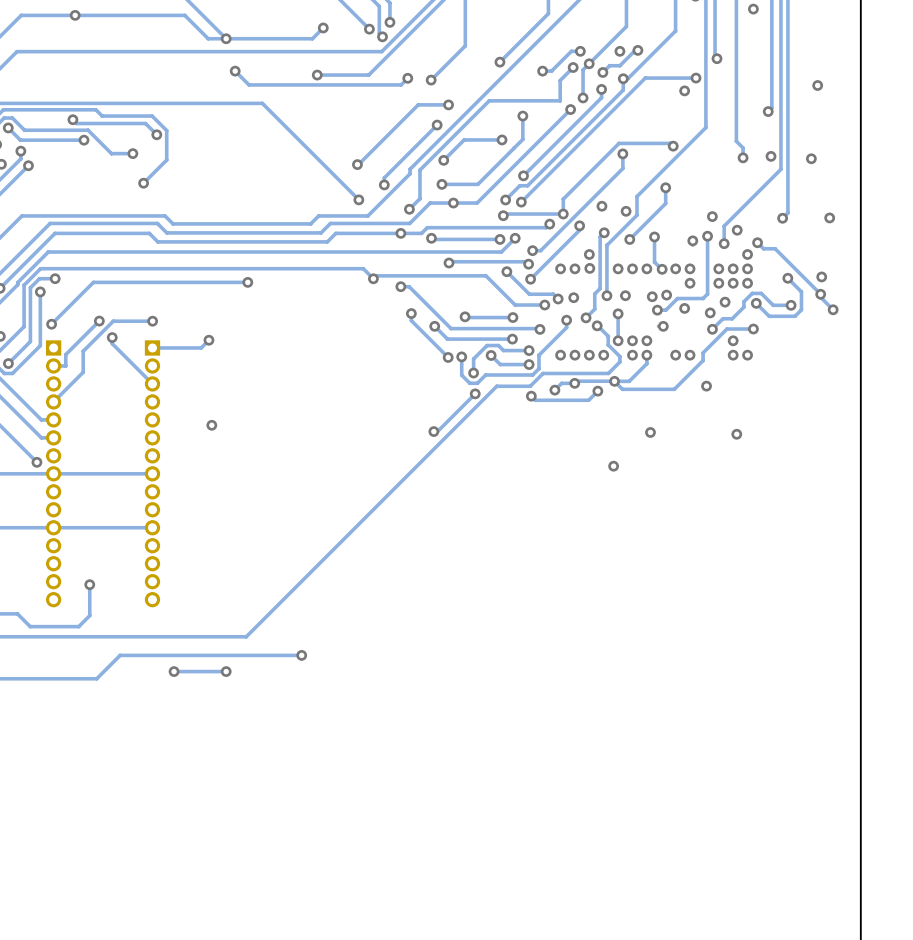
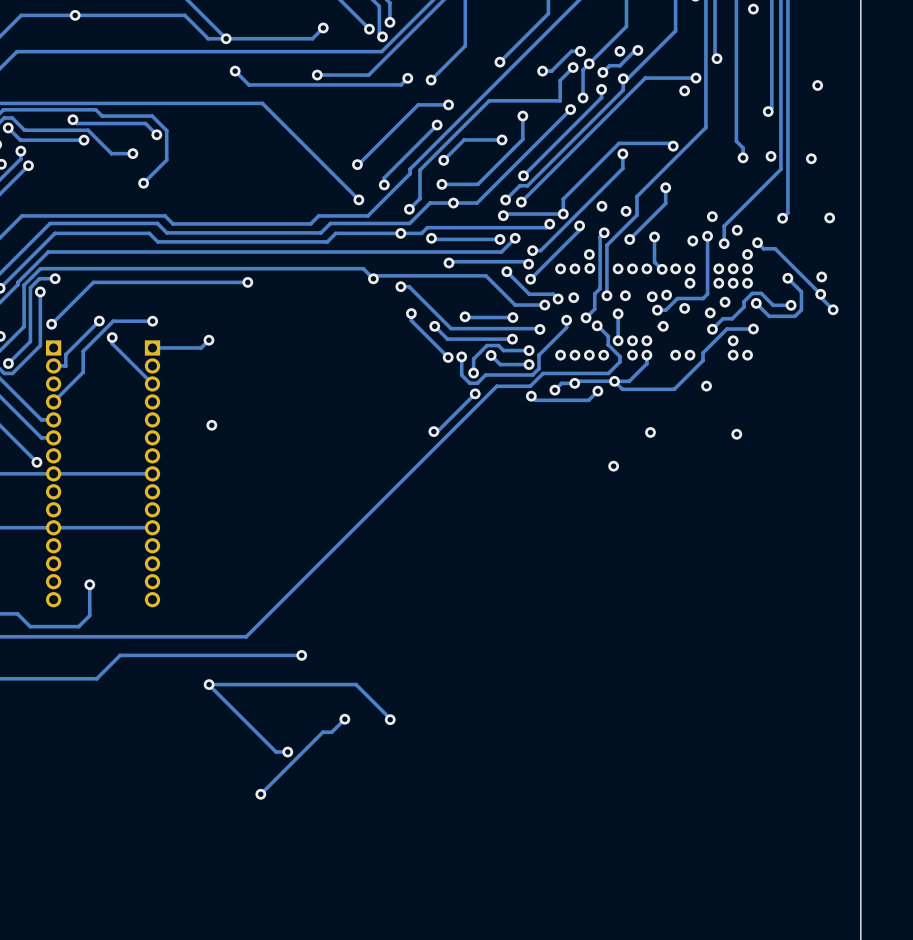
via: (174, 671) -> none
track: (226, 671) (174, 671) -> none
via: (226, 671) -> none
via: none -> (209, 684)
track: none -> (344, 719) (331, 732) (322, 732) (260, 794)
via: none -> (344, 719)
track: none -> (390, 719) (356, 684) (209, 684) (276, 752) (287, 752)
via: none -> (390, 719)
via: none -> (287, 752)
via: none -> (260, 794)

